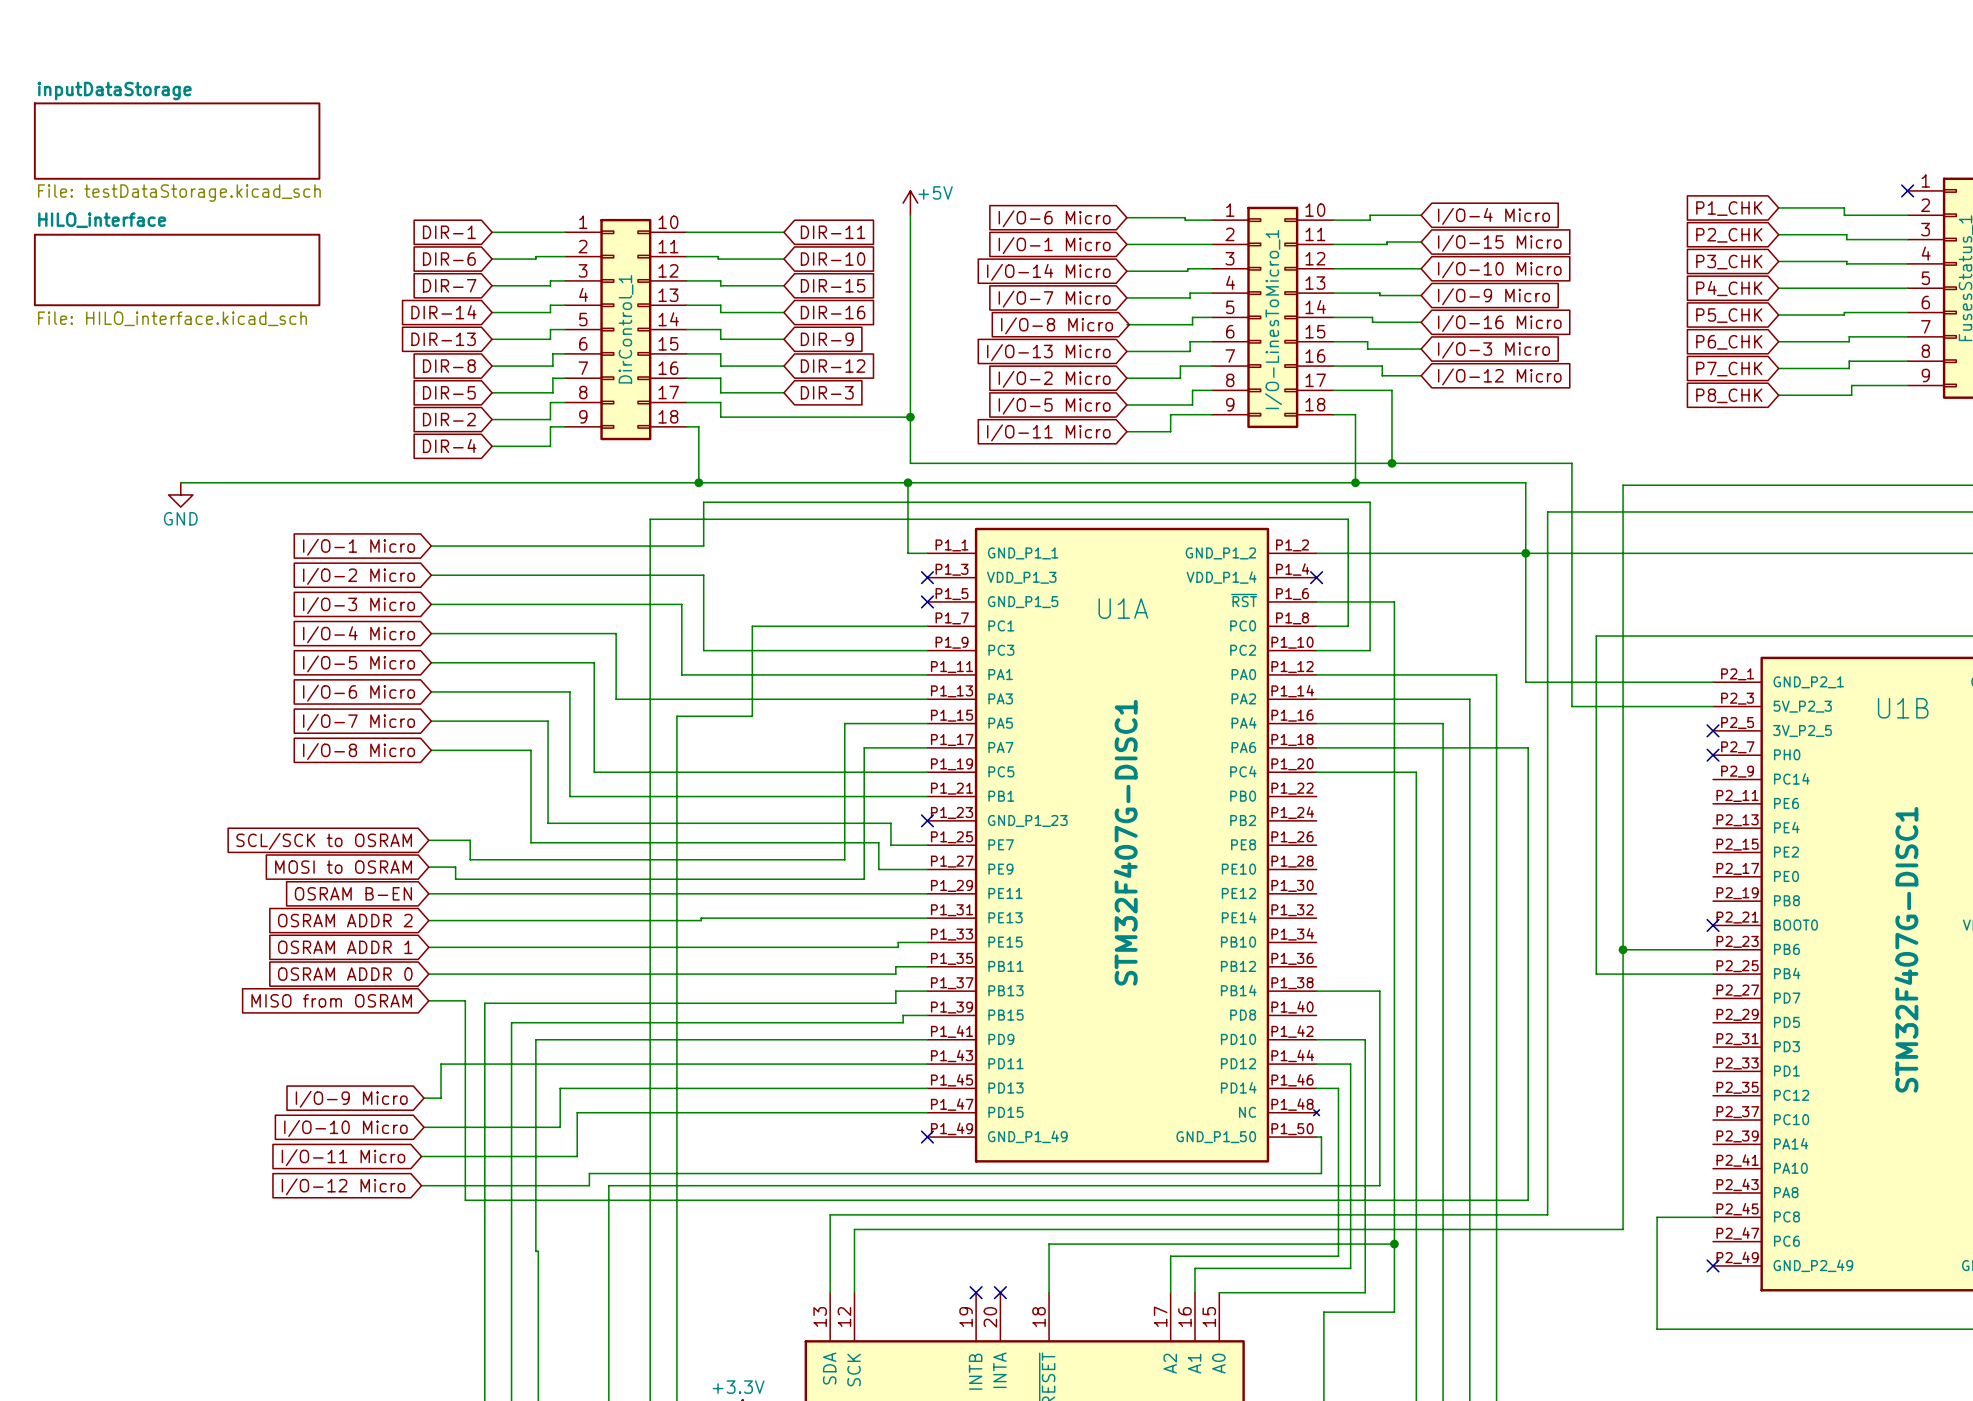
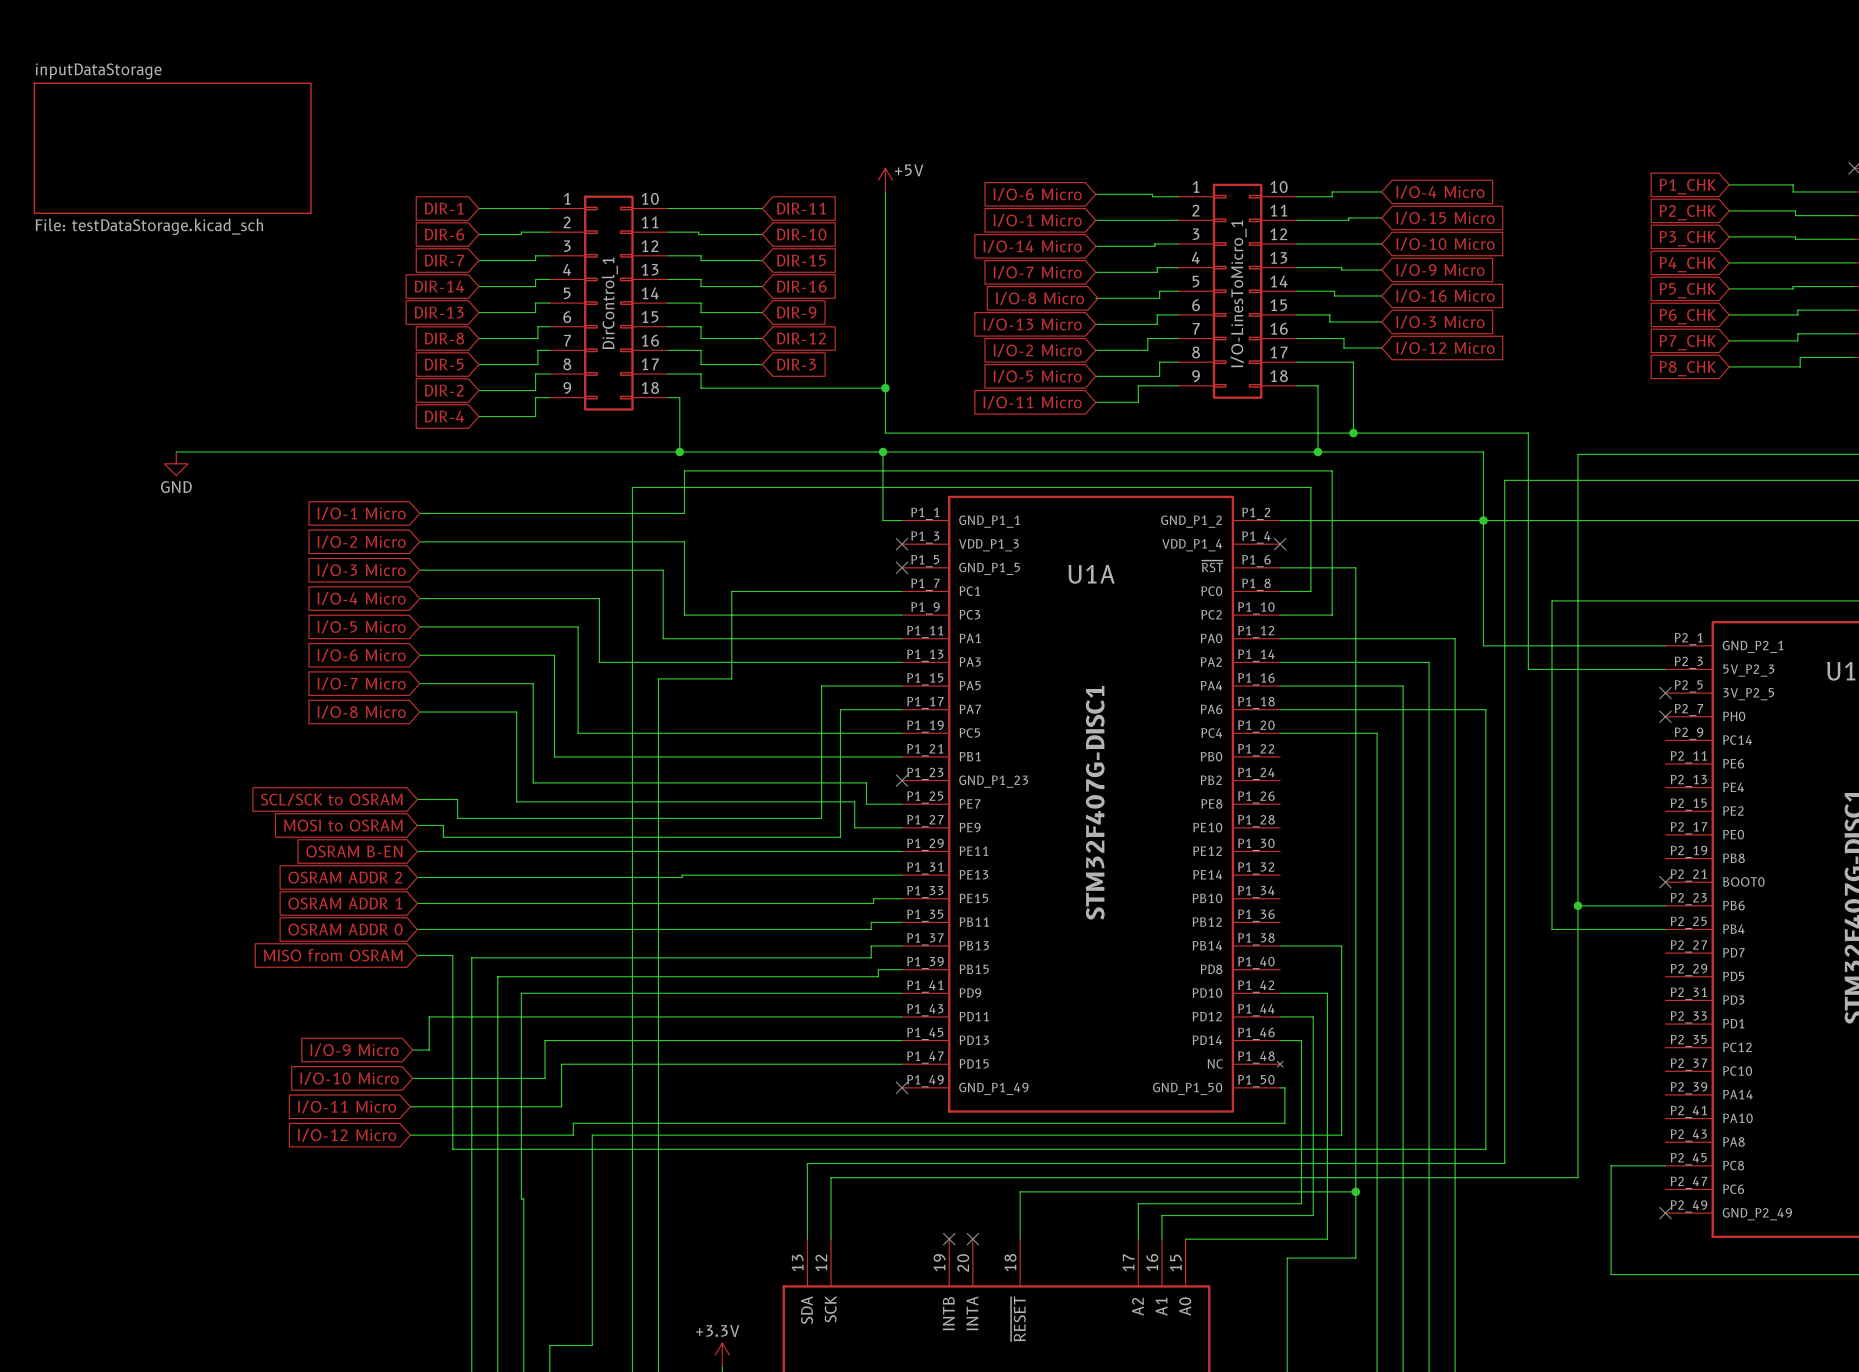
sheet inputDataStorage: File: testDataStorage.kicad_sch (177, 141) -> none
sheet inputDataStorage: none -> File: testDataStorage.kicad_sch (172, 148)
sheet HILO_interface: File: HILO_interface.kicad_sch (177, 269) -> none

